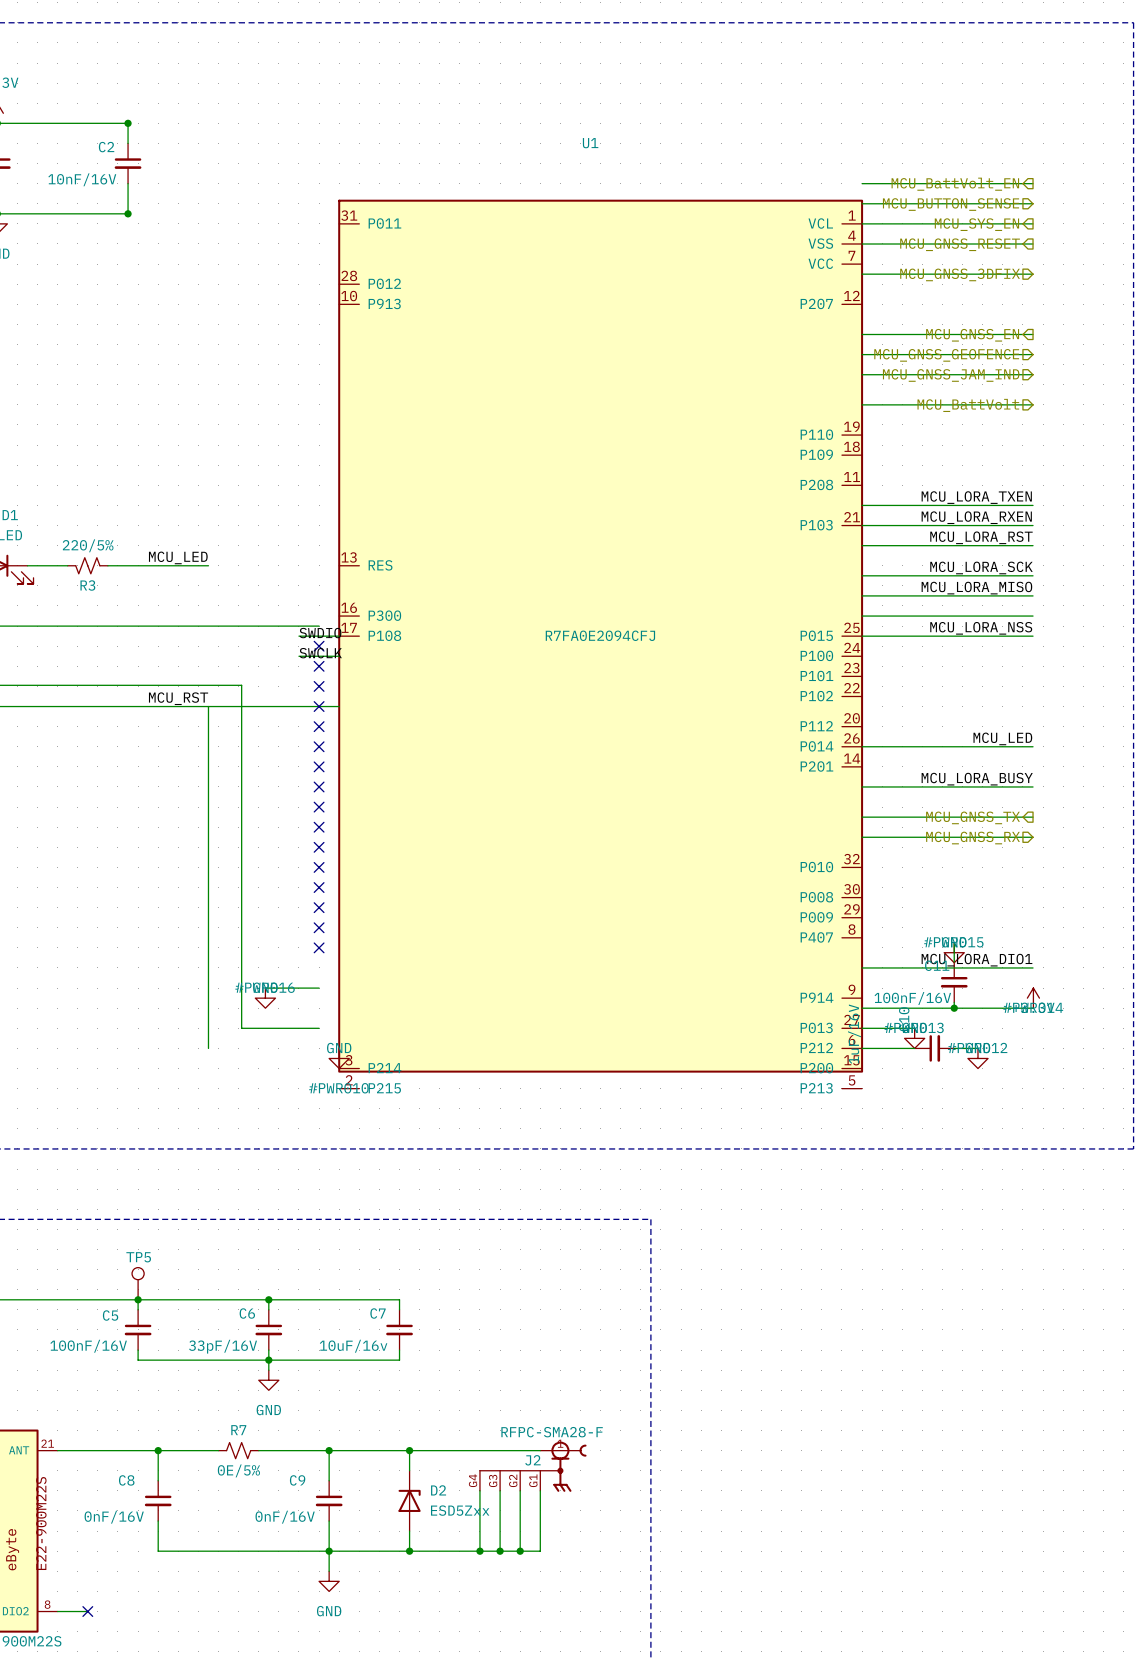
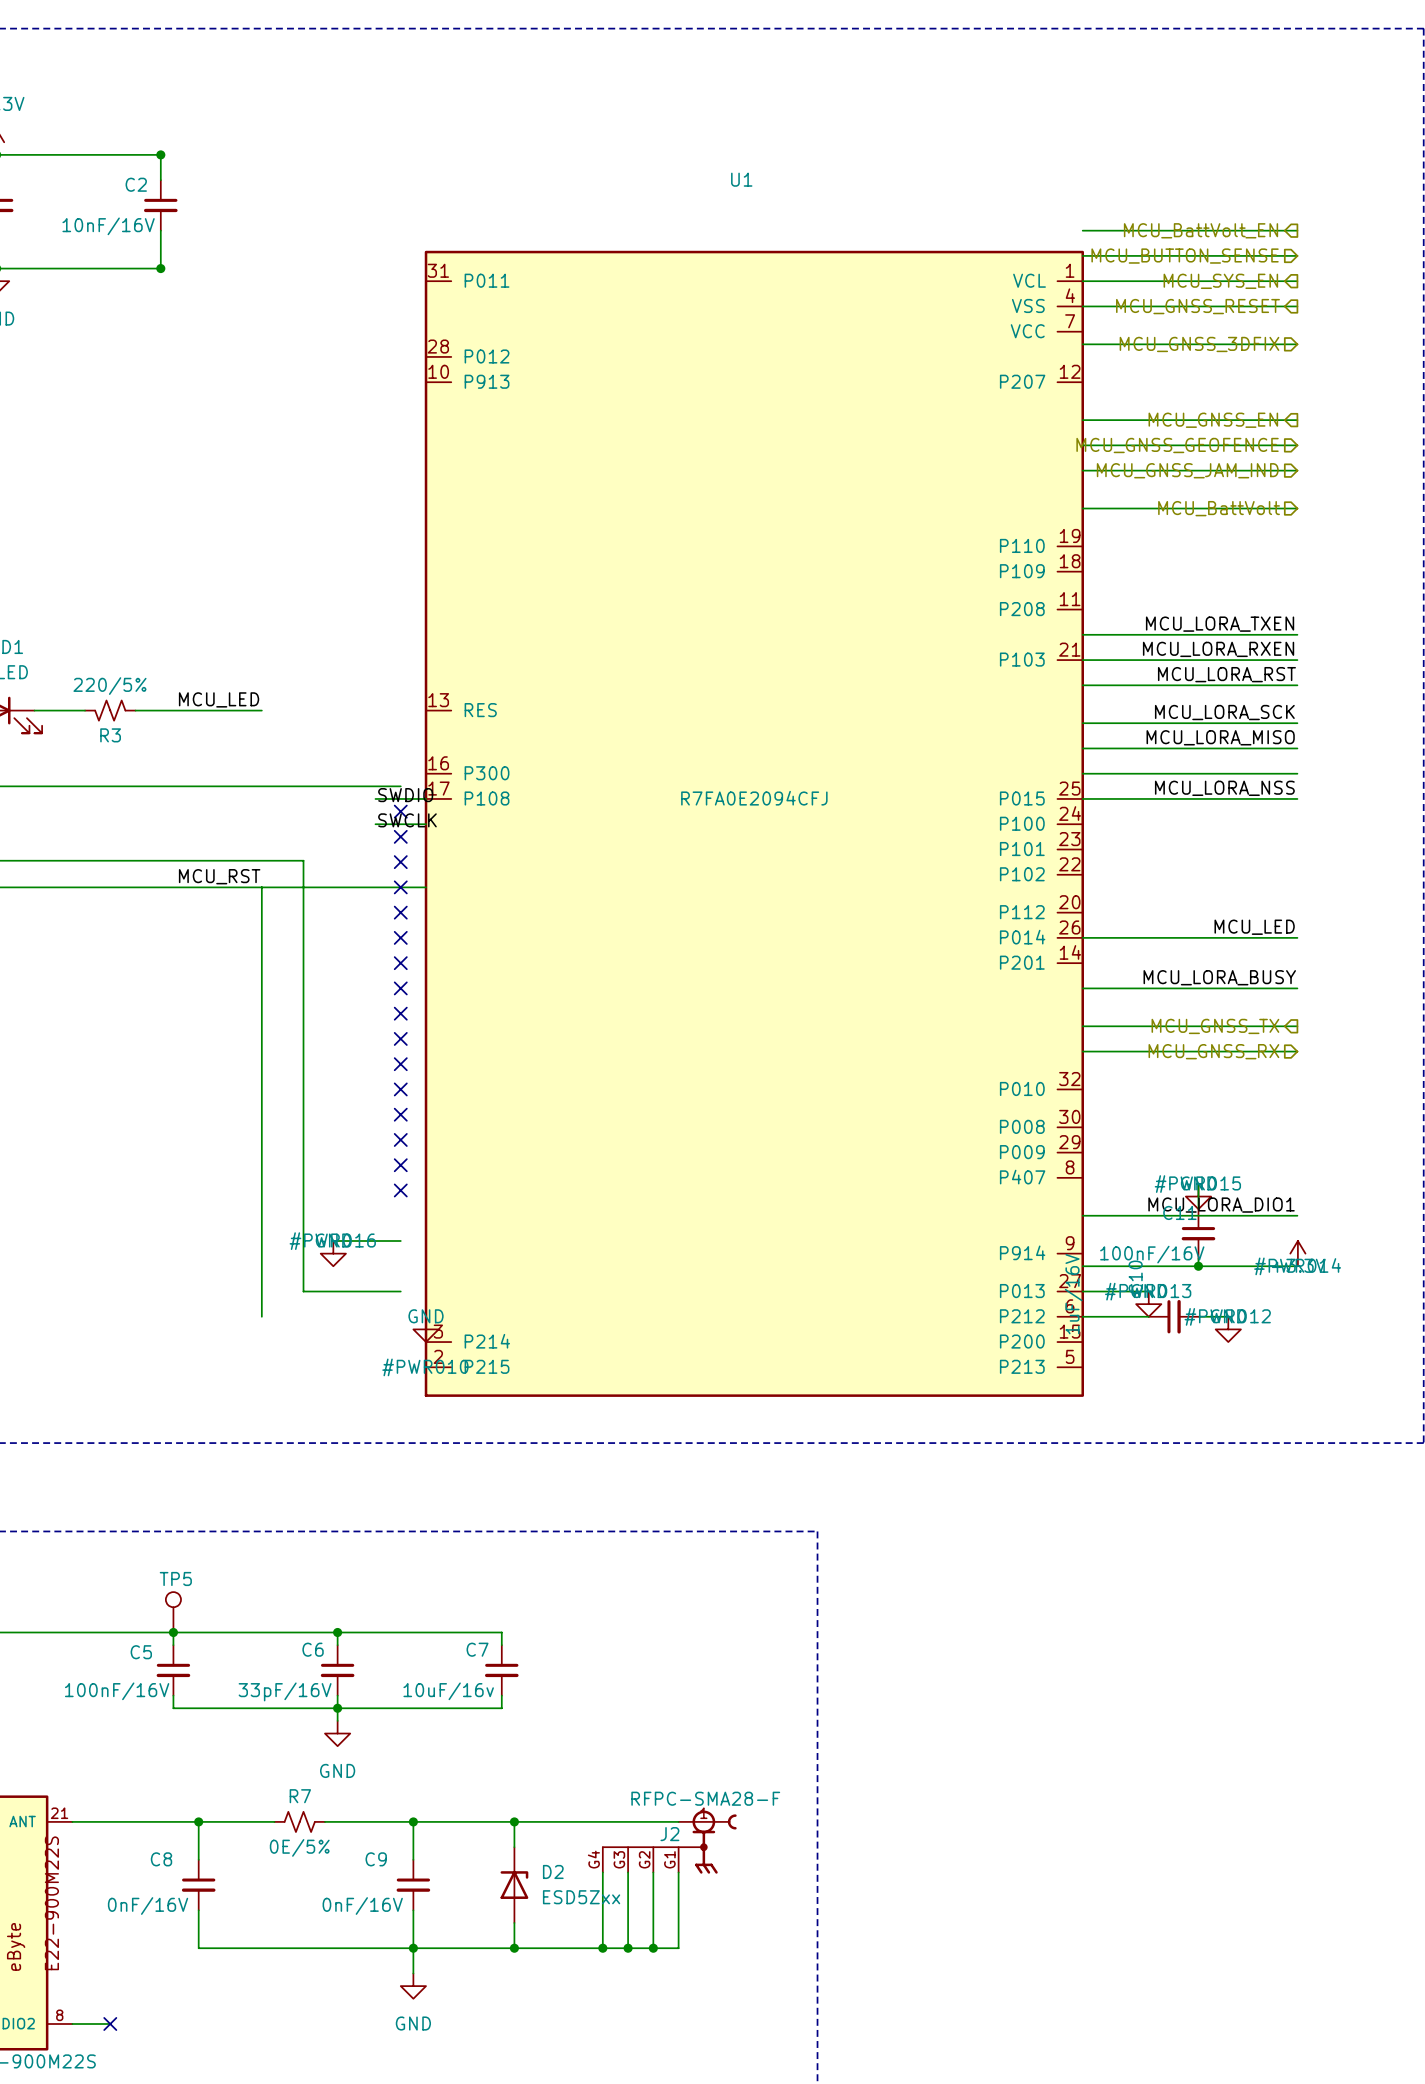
U1 symbol: [338, 199, 864, 1089] -> [424, 250, 1084, 1397]

